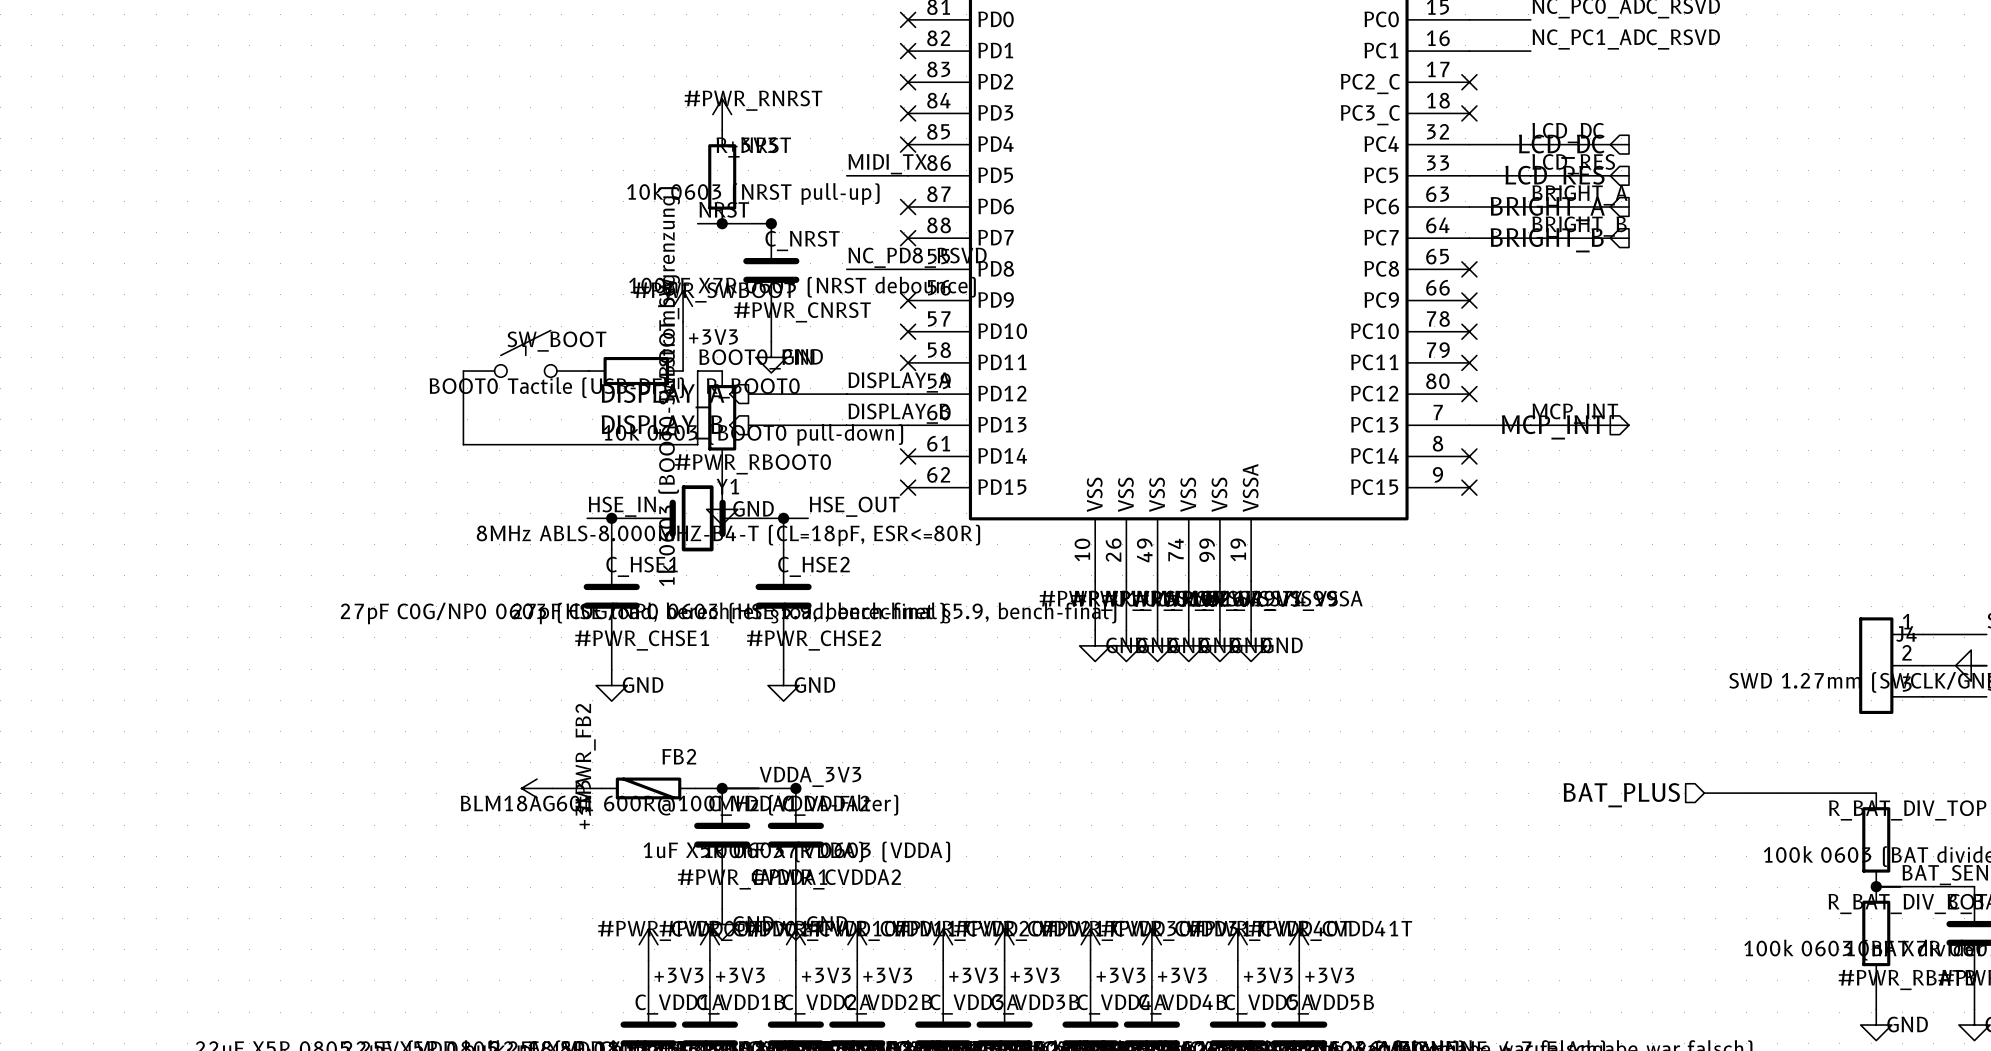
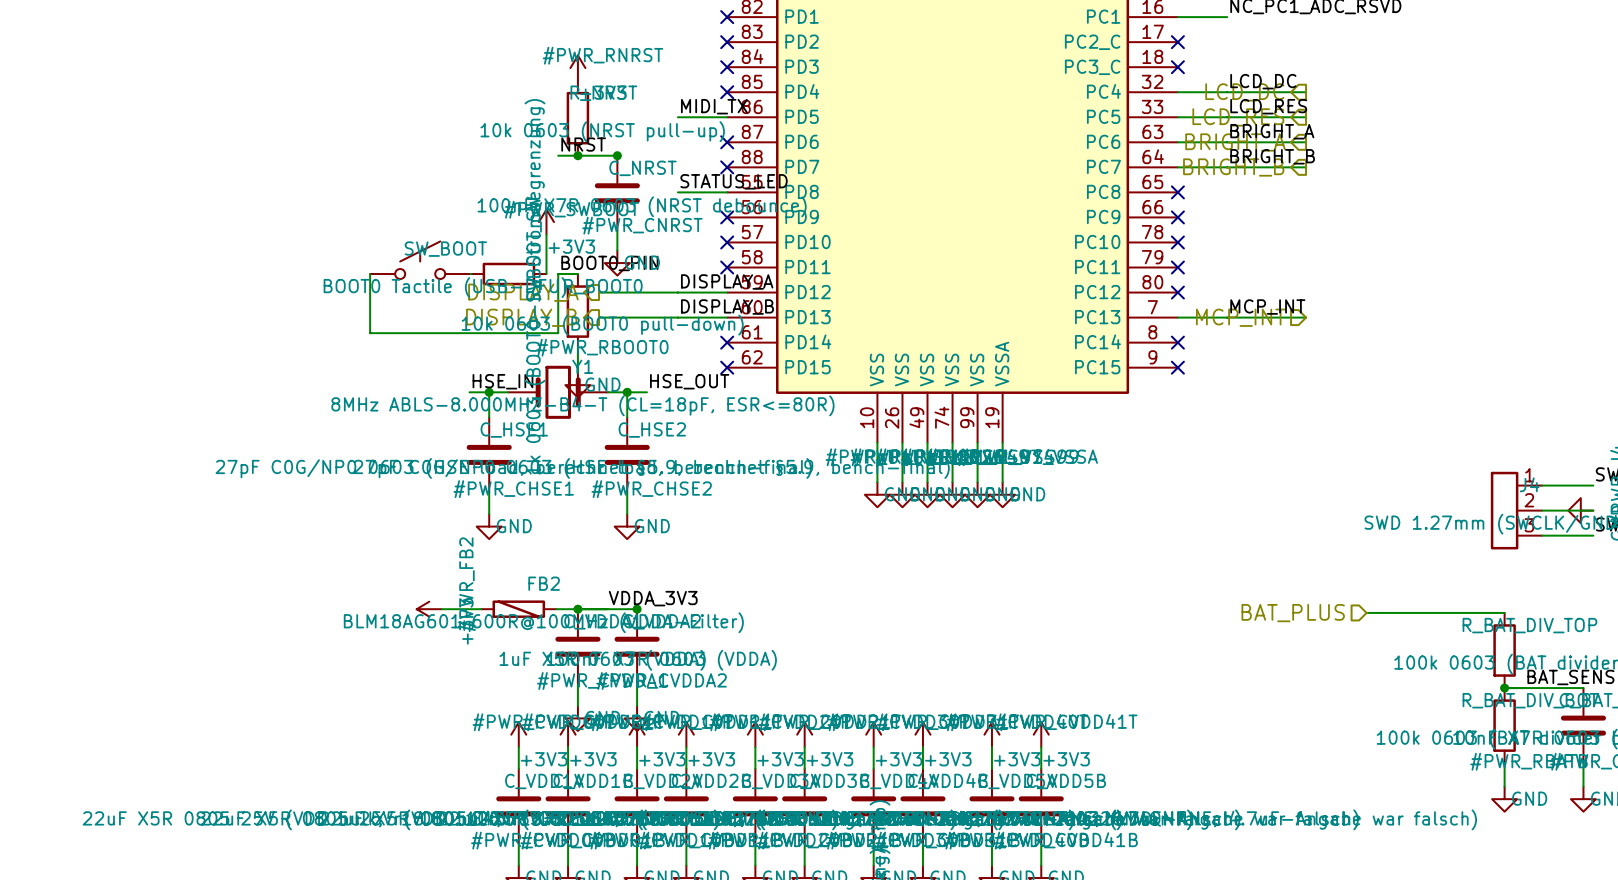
label: NC_PD8_RSVD (917, 257) -> STATUS_LED (734, 181)

